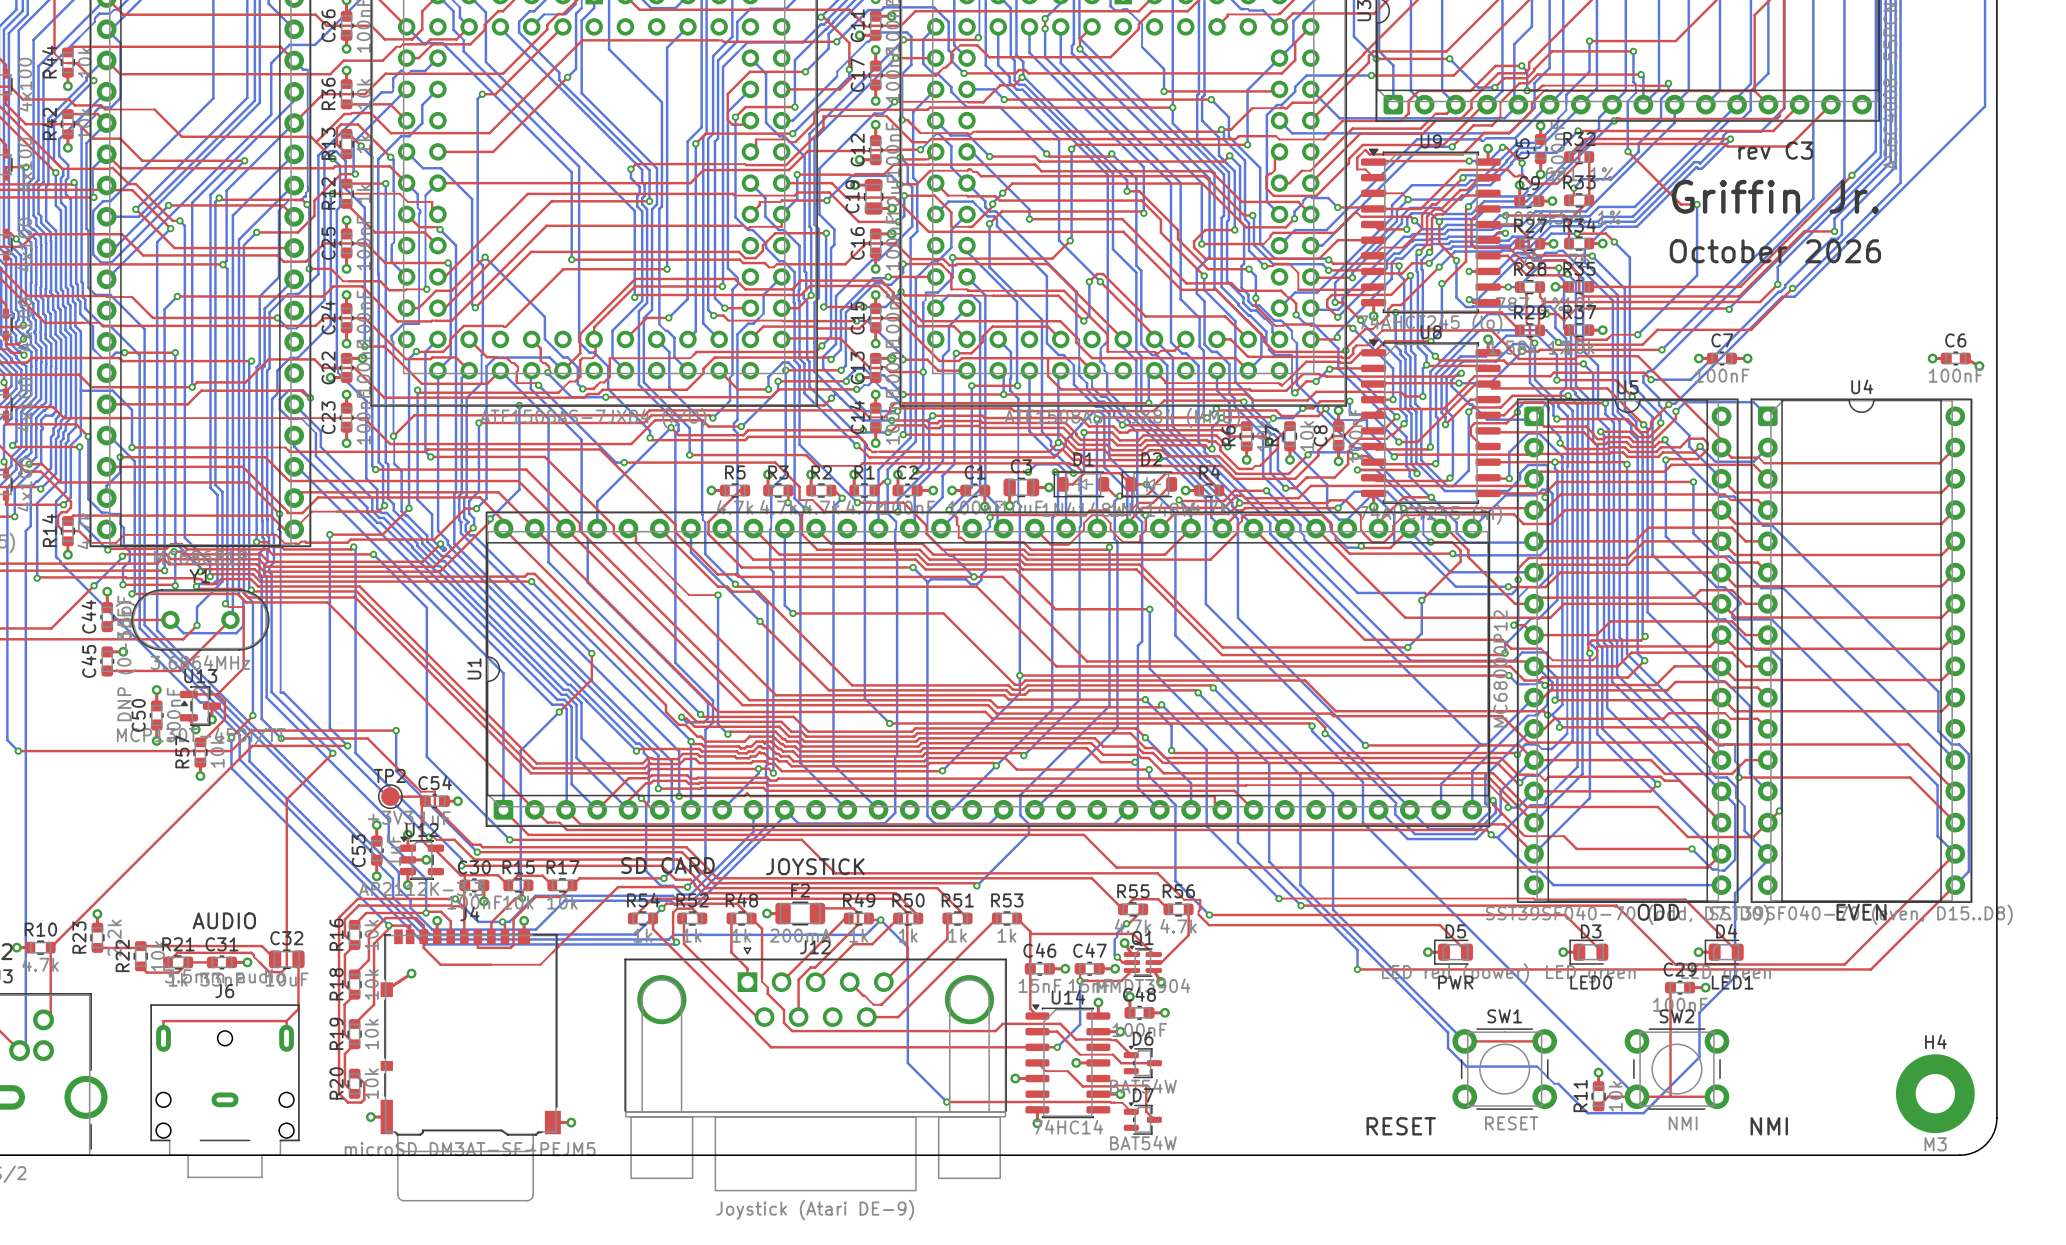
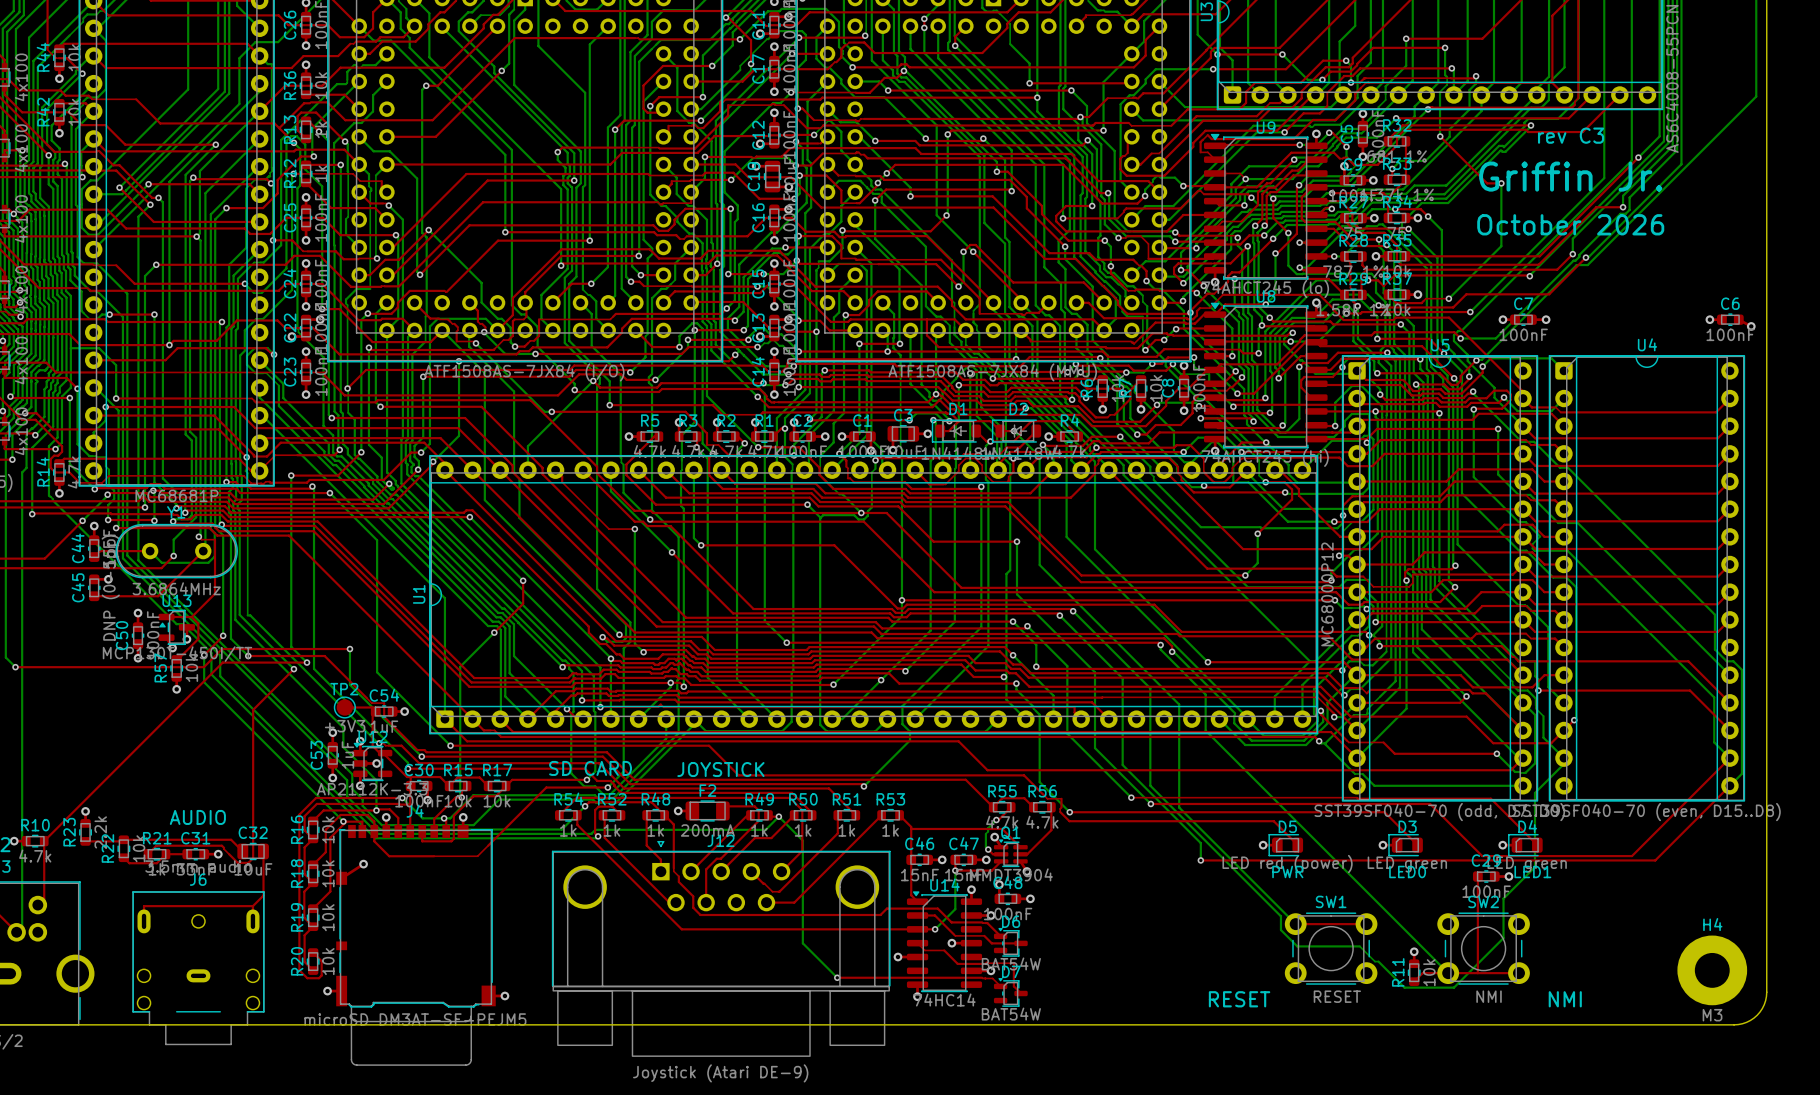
text: ODD (1658, 912) -> none
text: EVEN (1861, 912) -> none

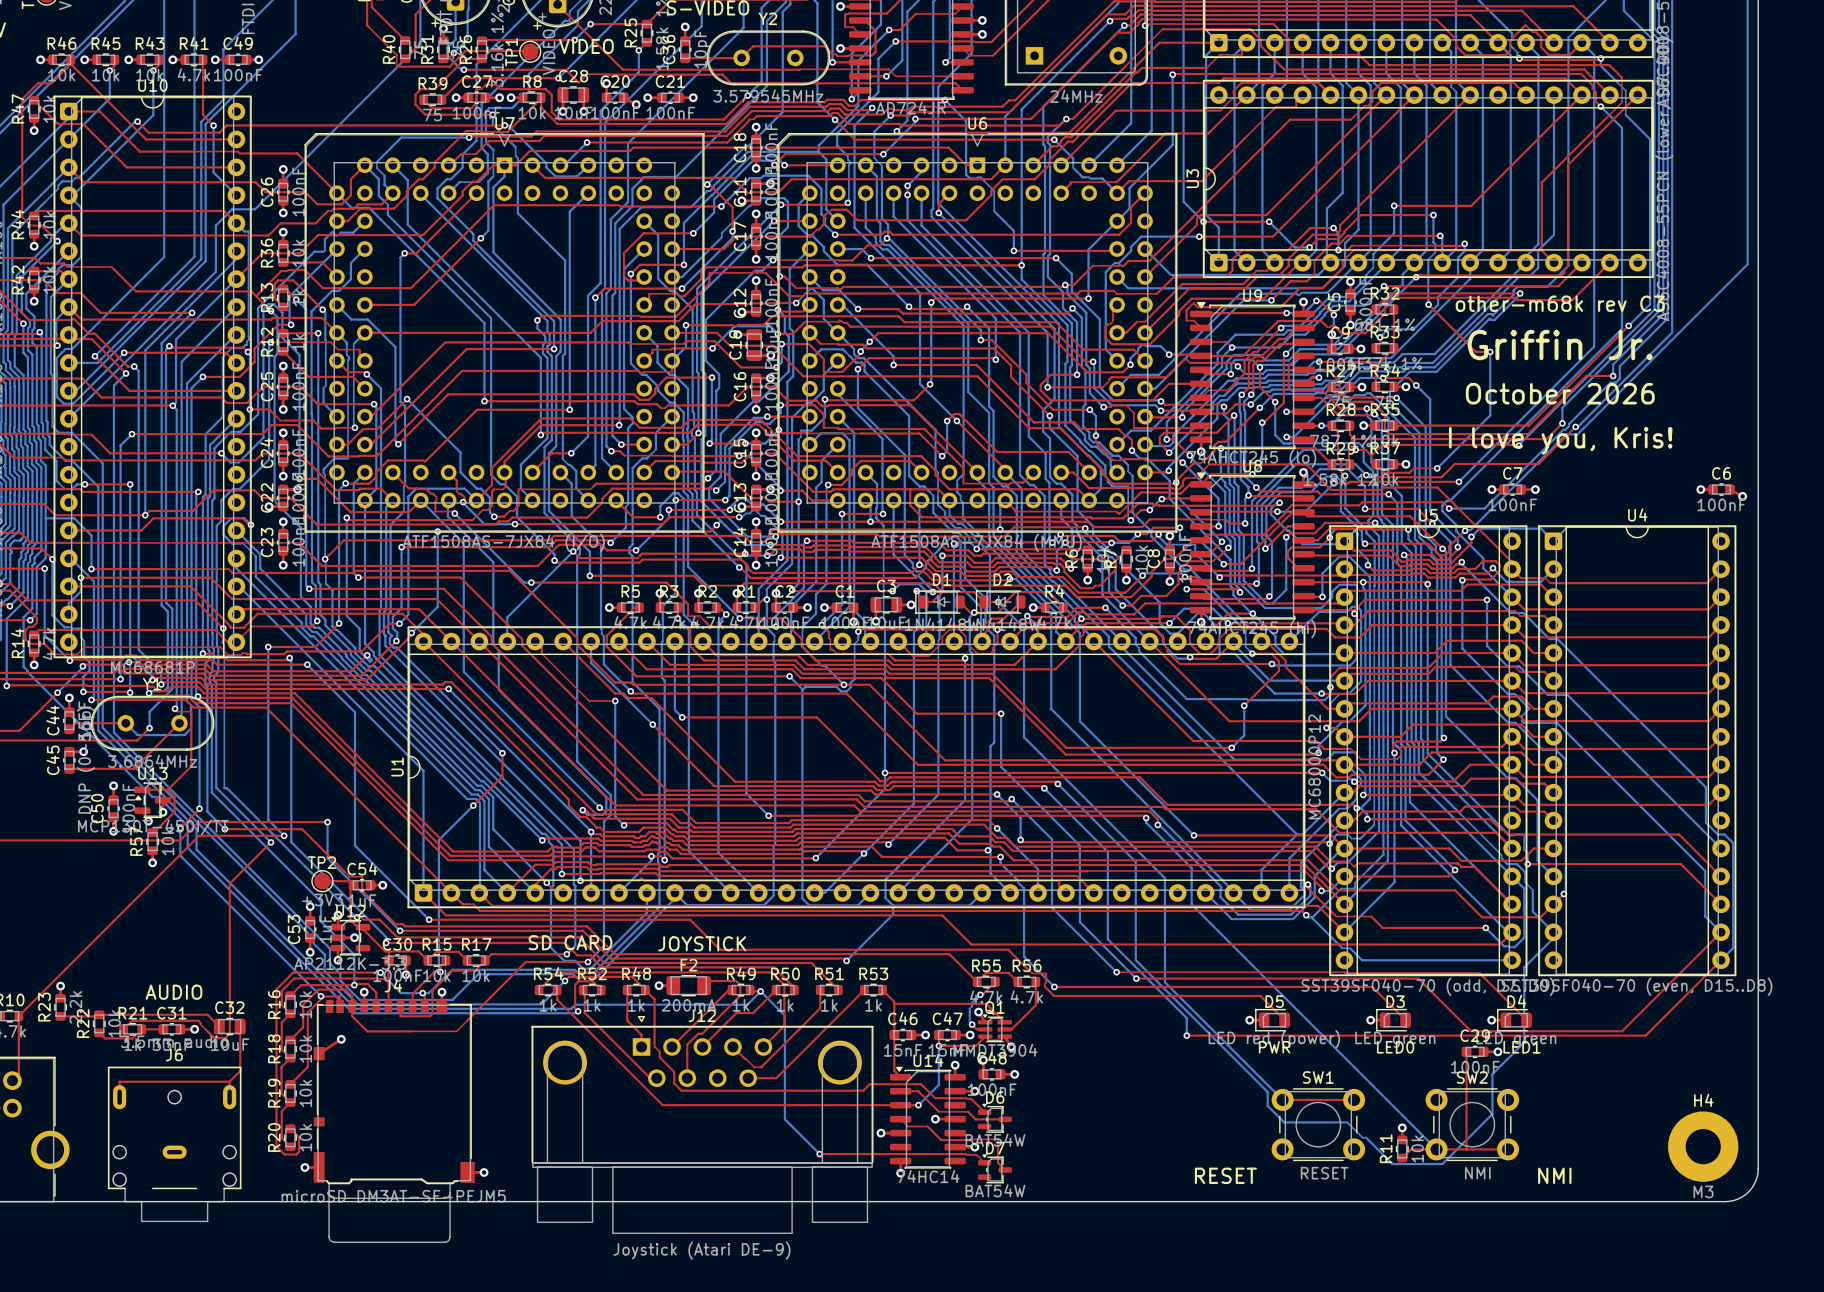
text: rev C3 (1571, 135) -> other-m68k rev C3 (1560, 303)
text: none -> I love you, Kris! (1560, 440)

